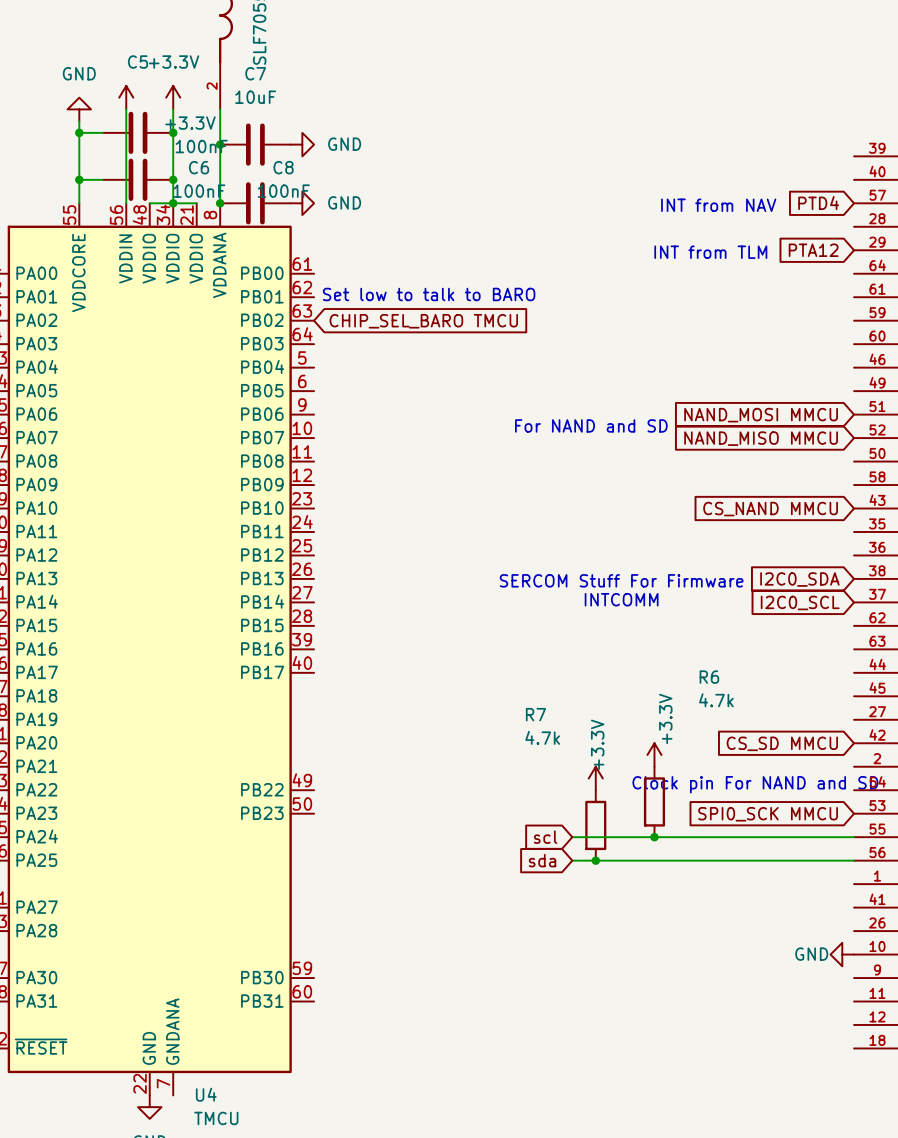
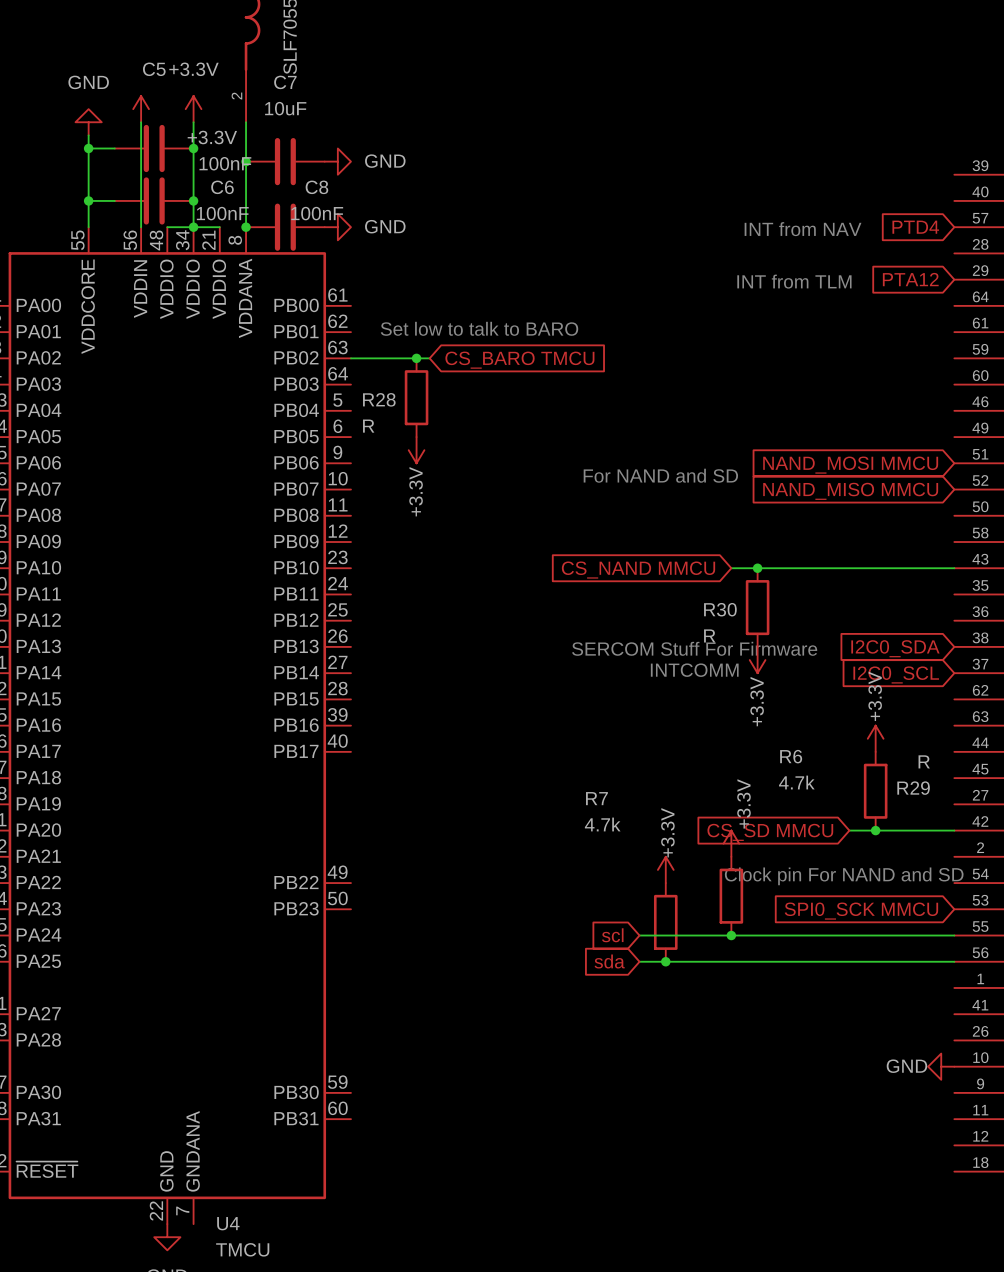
wire: none -> (350, 358) (429, 358)
junction: none -> (416, 358)
global label: CHIP_SEL_BARO TMCU (423, 321) -> CS_BARO TMCU (519, 360)
R28: none -> R (416, 397)
power symbol: none -> +3.3V (416, 450)
wire: none -> (731, 568) (954, 568)
junction: none -> (757, 568)
global label position: CS_NAND MMCU (770, 509) -> CS_NAND MMCU (638, 570)
R30: none -> R (757, 607)
power symbol: none -> +3.3V (757, 660)
power symbol: none -> +3.3V (875, 738)
R29: none -> R (875, 791)
wire: none -> (849, 830) (954, 830)
global label position: CS_SD MMCU (782, 743) -> CS_SD MMCU (770, 832)
junction: none -> (875, 830)

